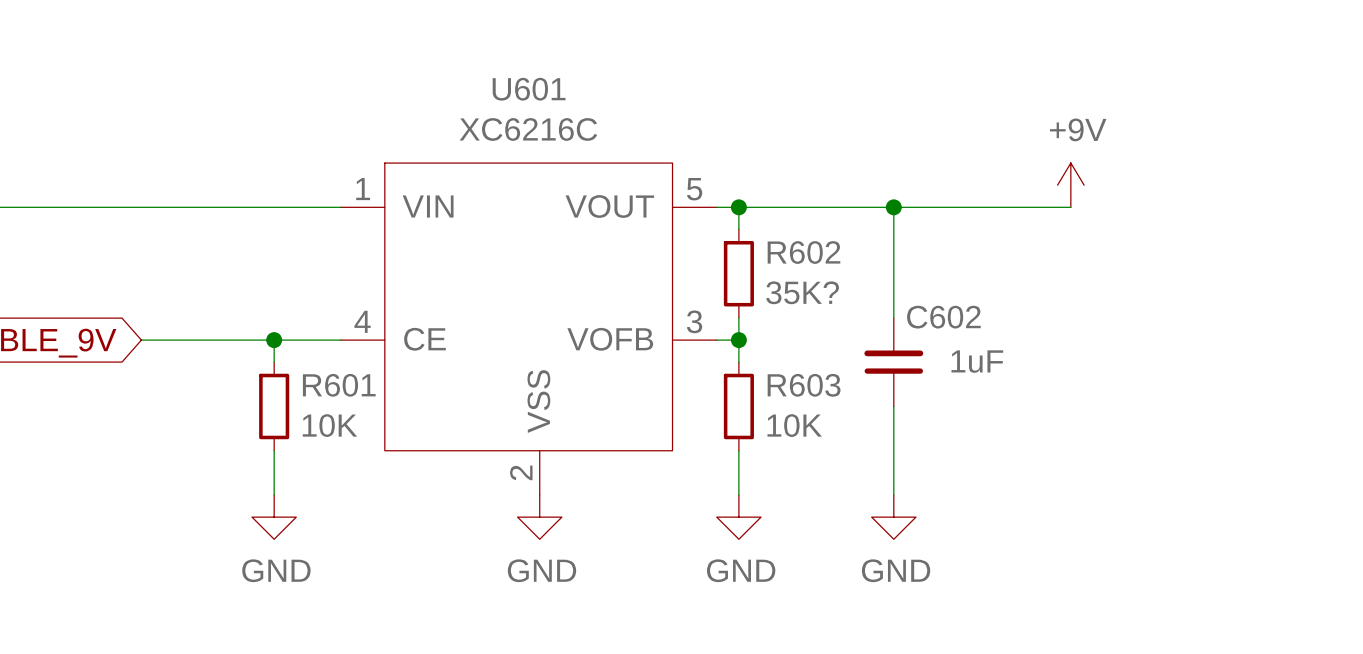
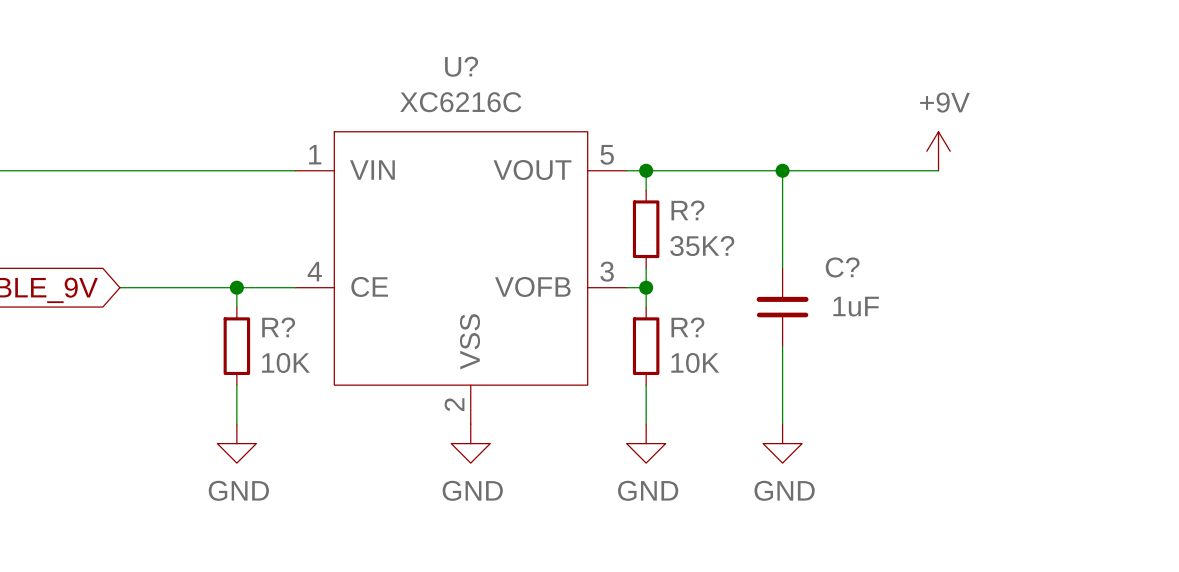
U601 name: U601 (529, 89) -> U? (461, 66)
R602 name: R602 (803, 252) -> R? (687, 210)
C602 name: C602 (943, 317) -> C? (842, 267)
R601 name: R601 (339, 385) -> R? (278, 327)
R603 name: R603 (804, 385) -> R? (687, 327)

